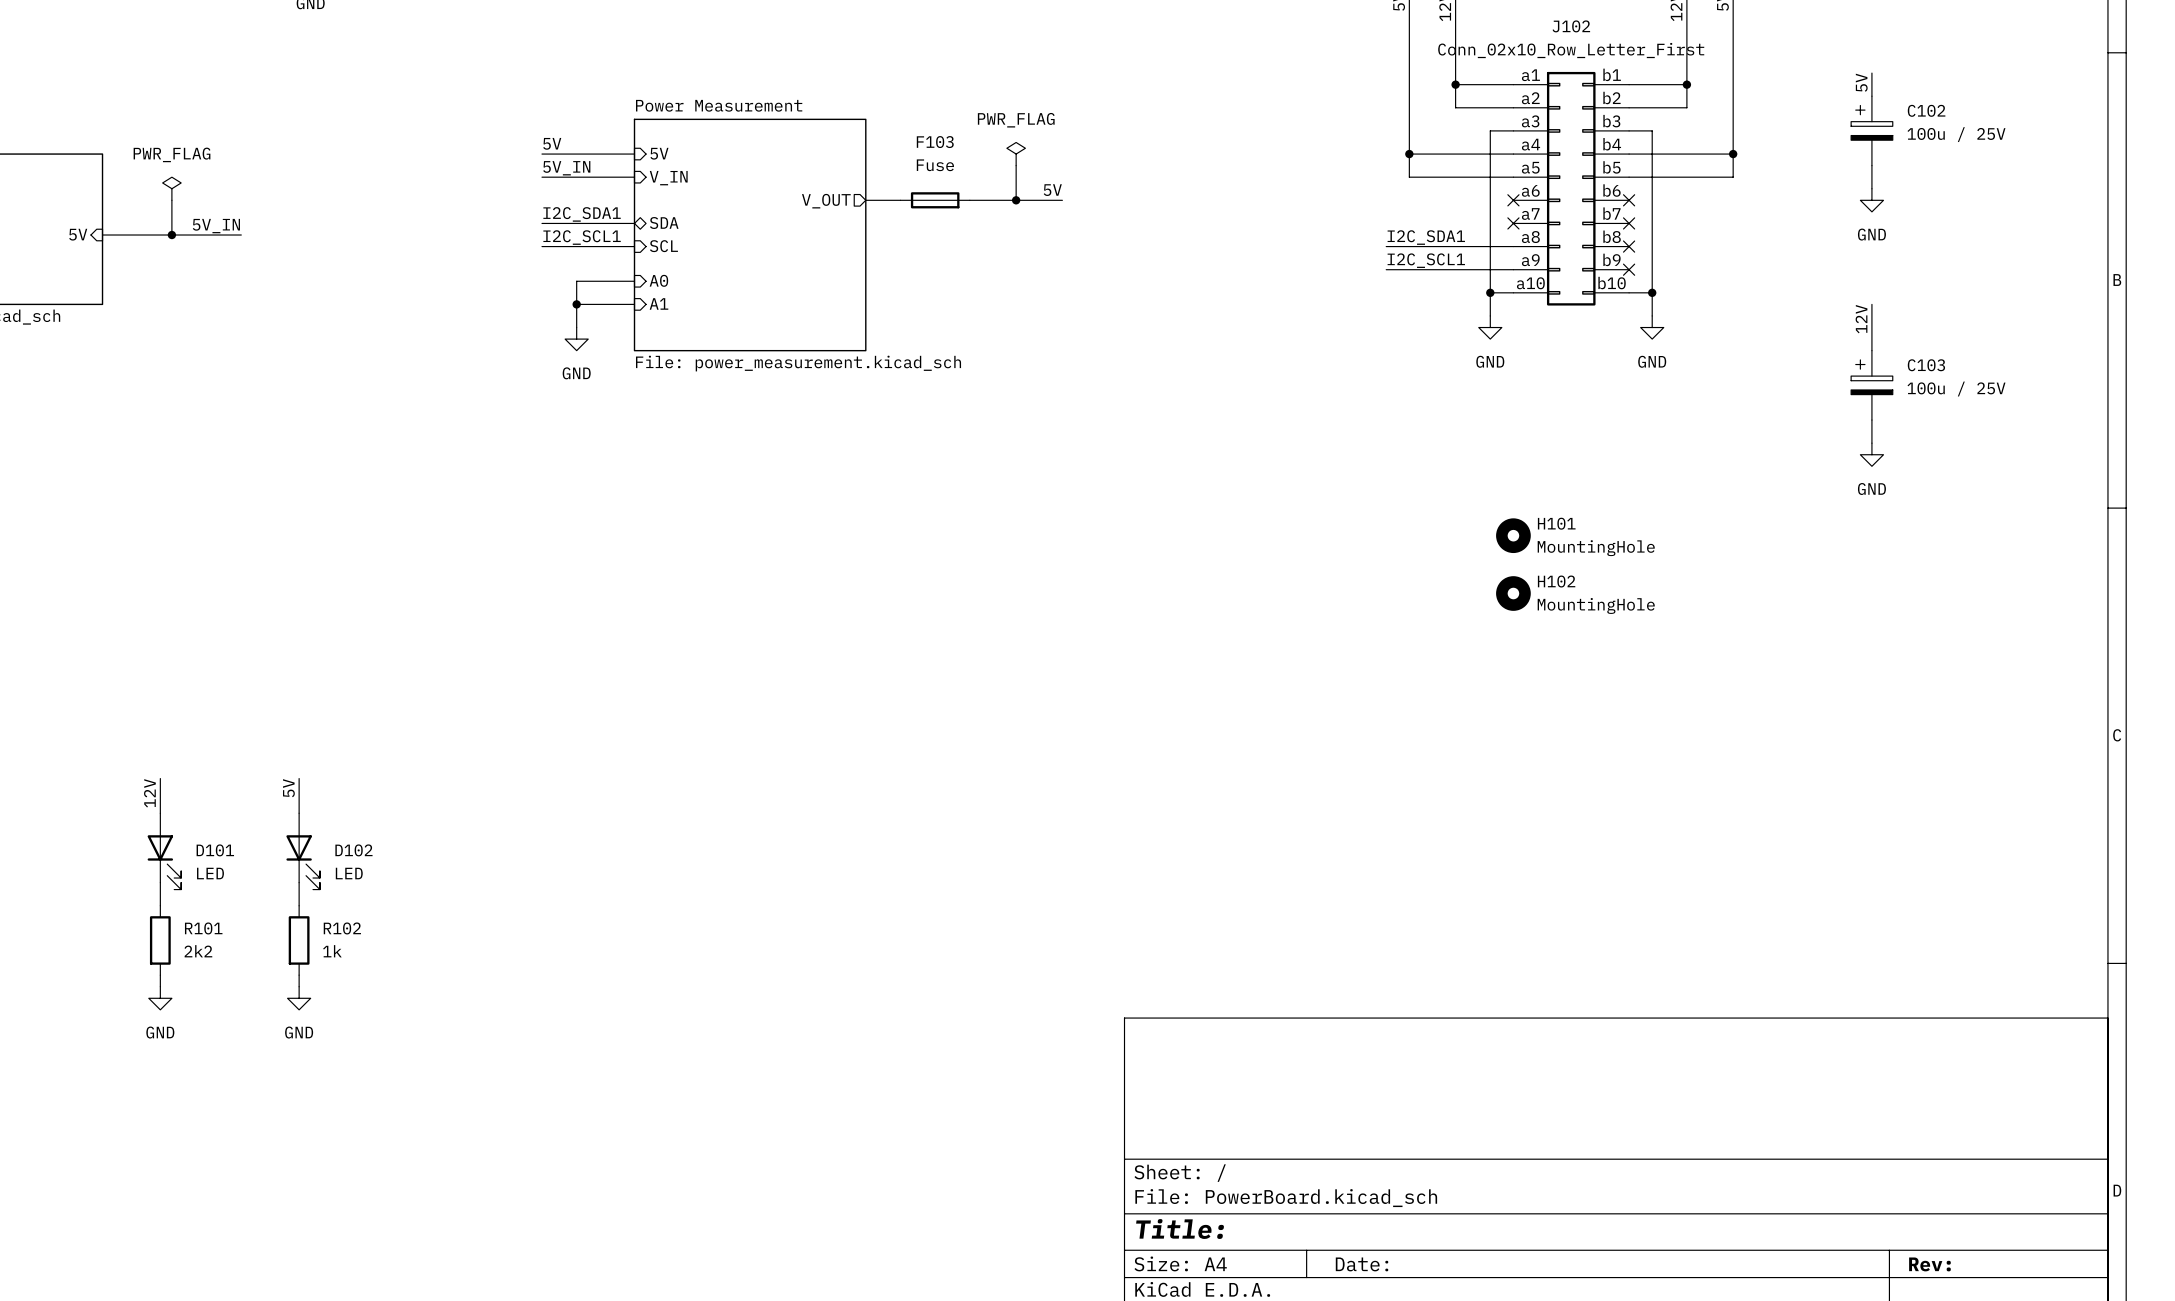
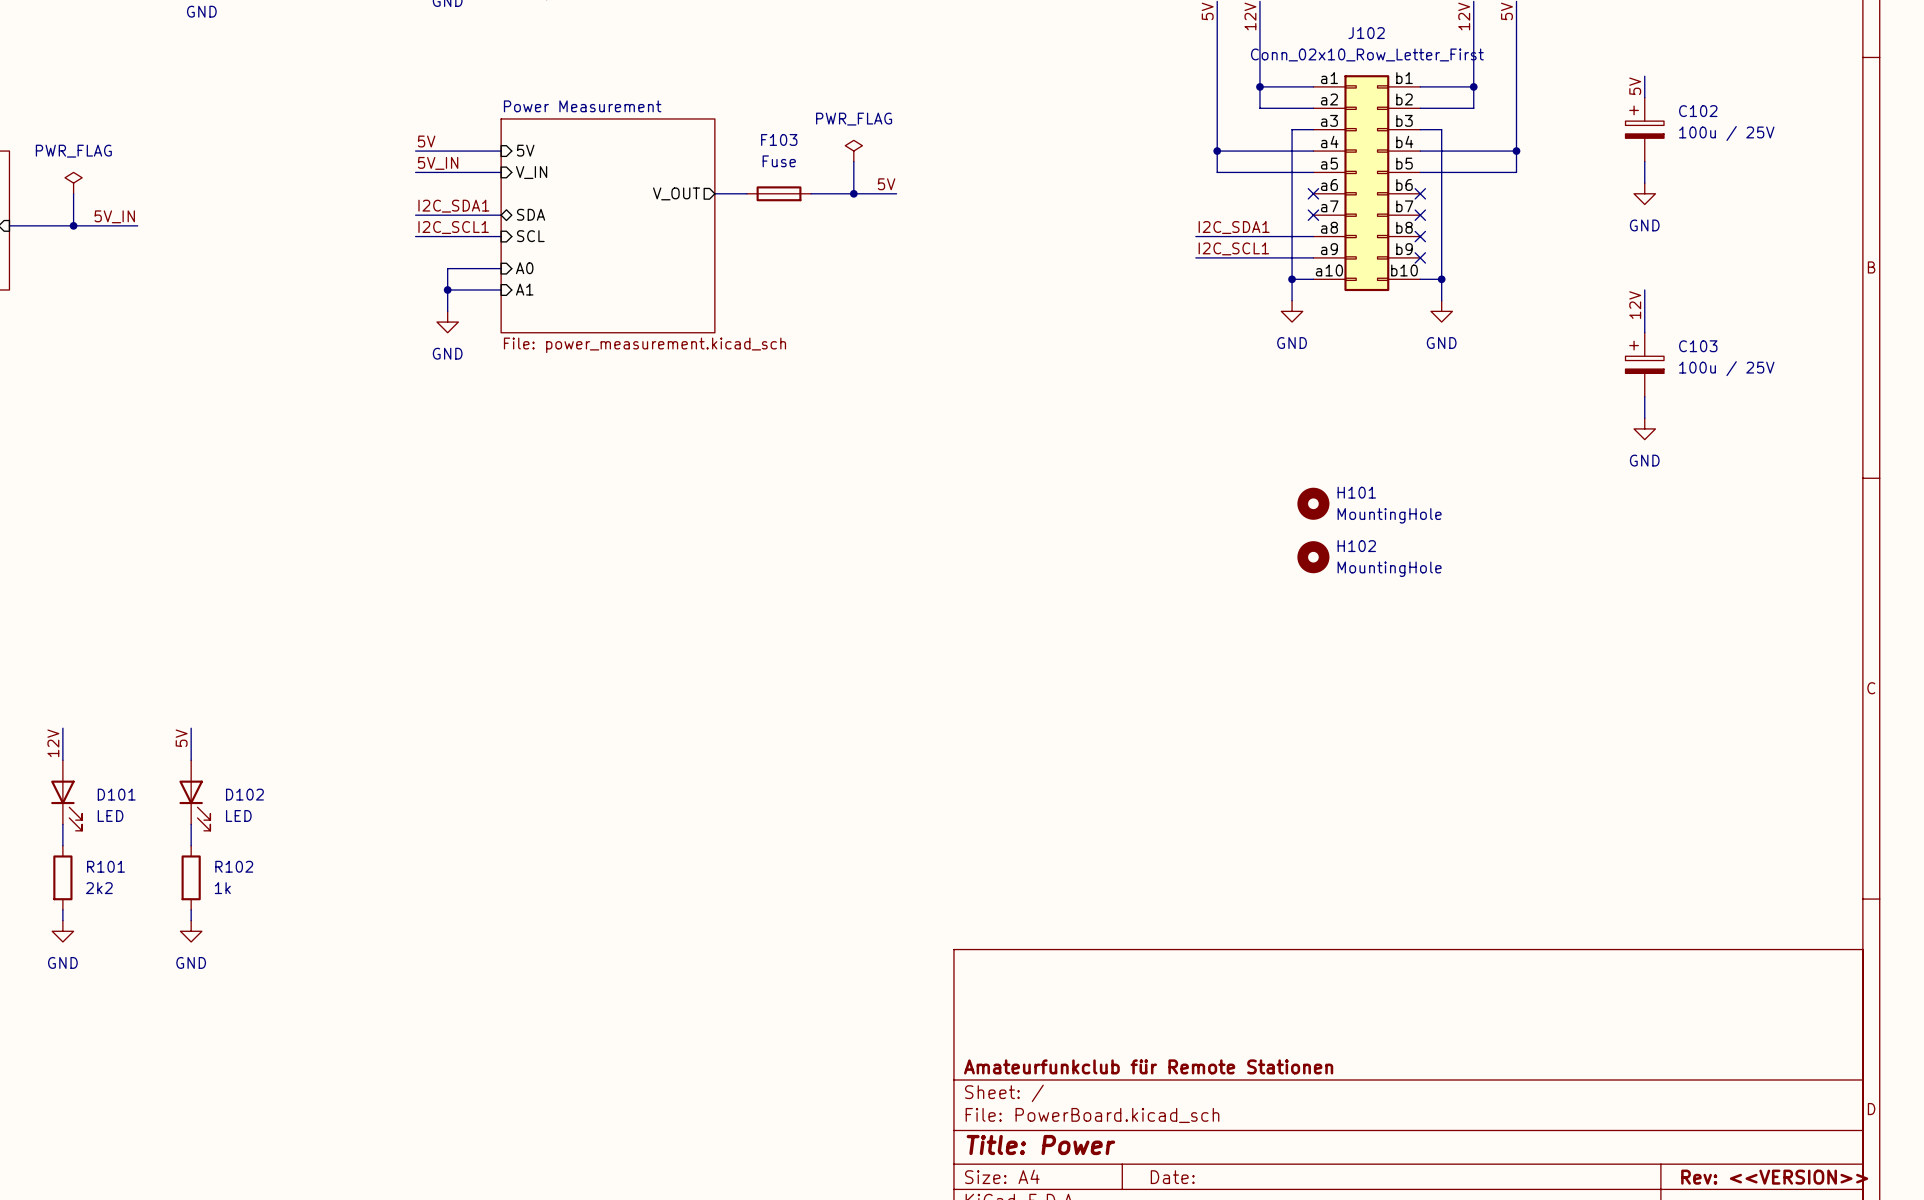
title block: none -> Amateurfunkclub für Remote Stationen (1148, 1066)
title block: Title: (1180, 1229) -> Title: Power (1040, 1145)
title block: Rev: (1929, 1264) -> Rev: <<VERSION>> (1774, 1177)

